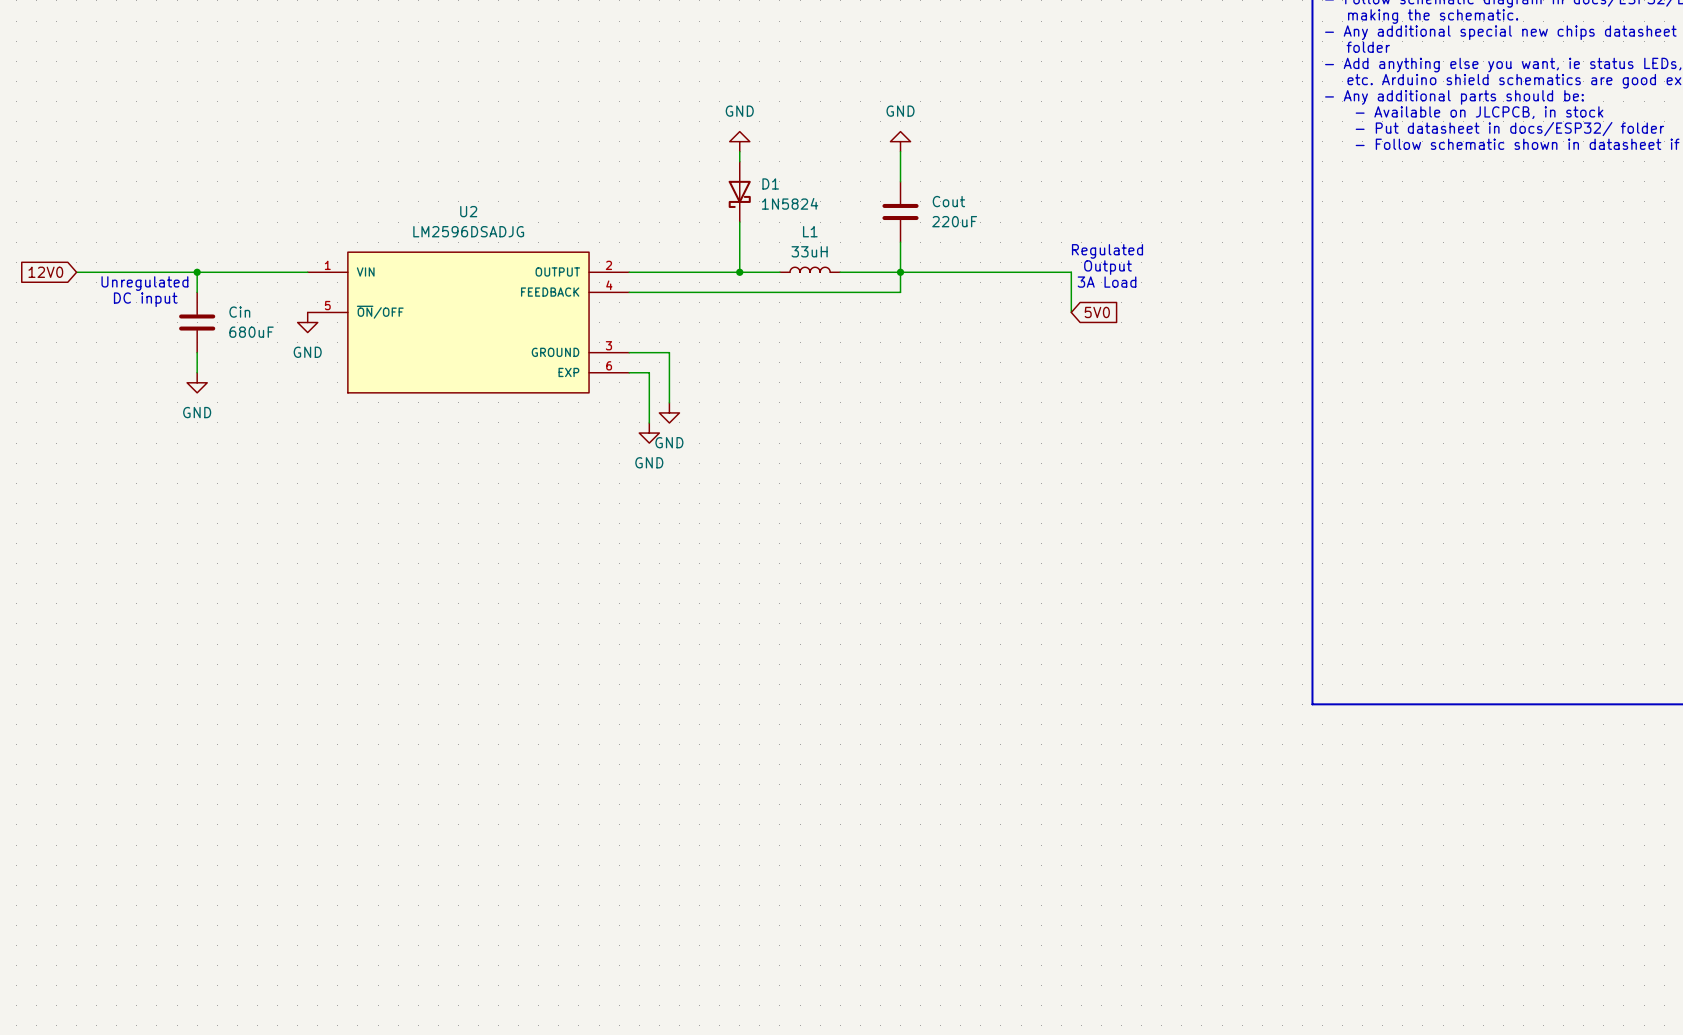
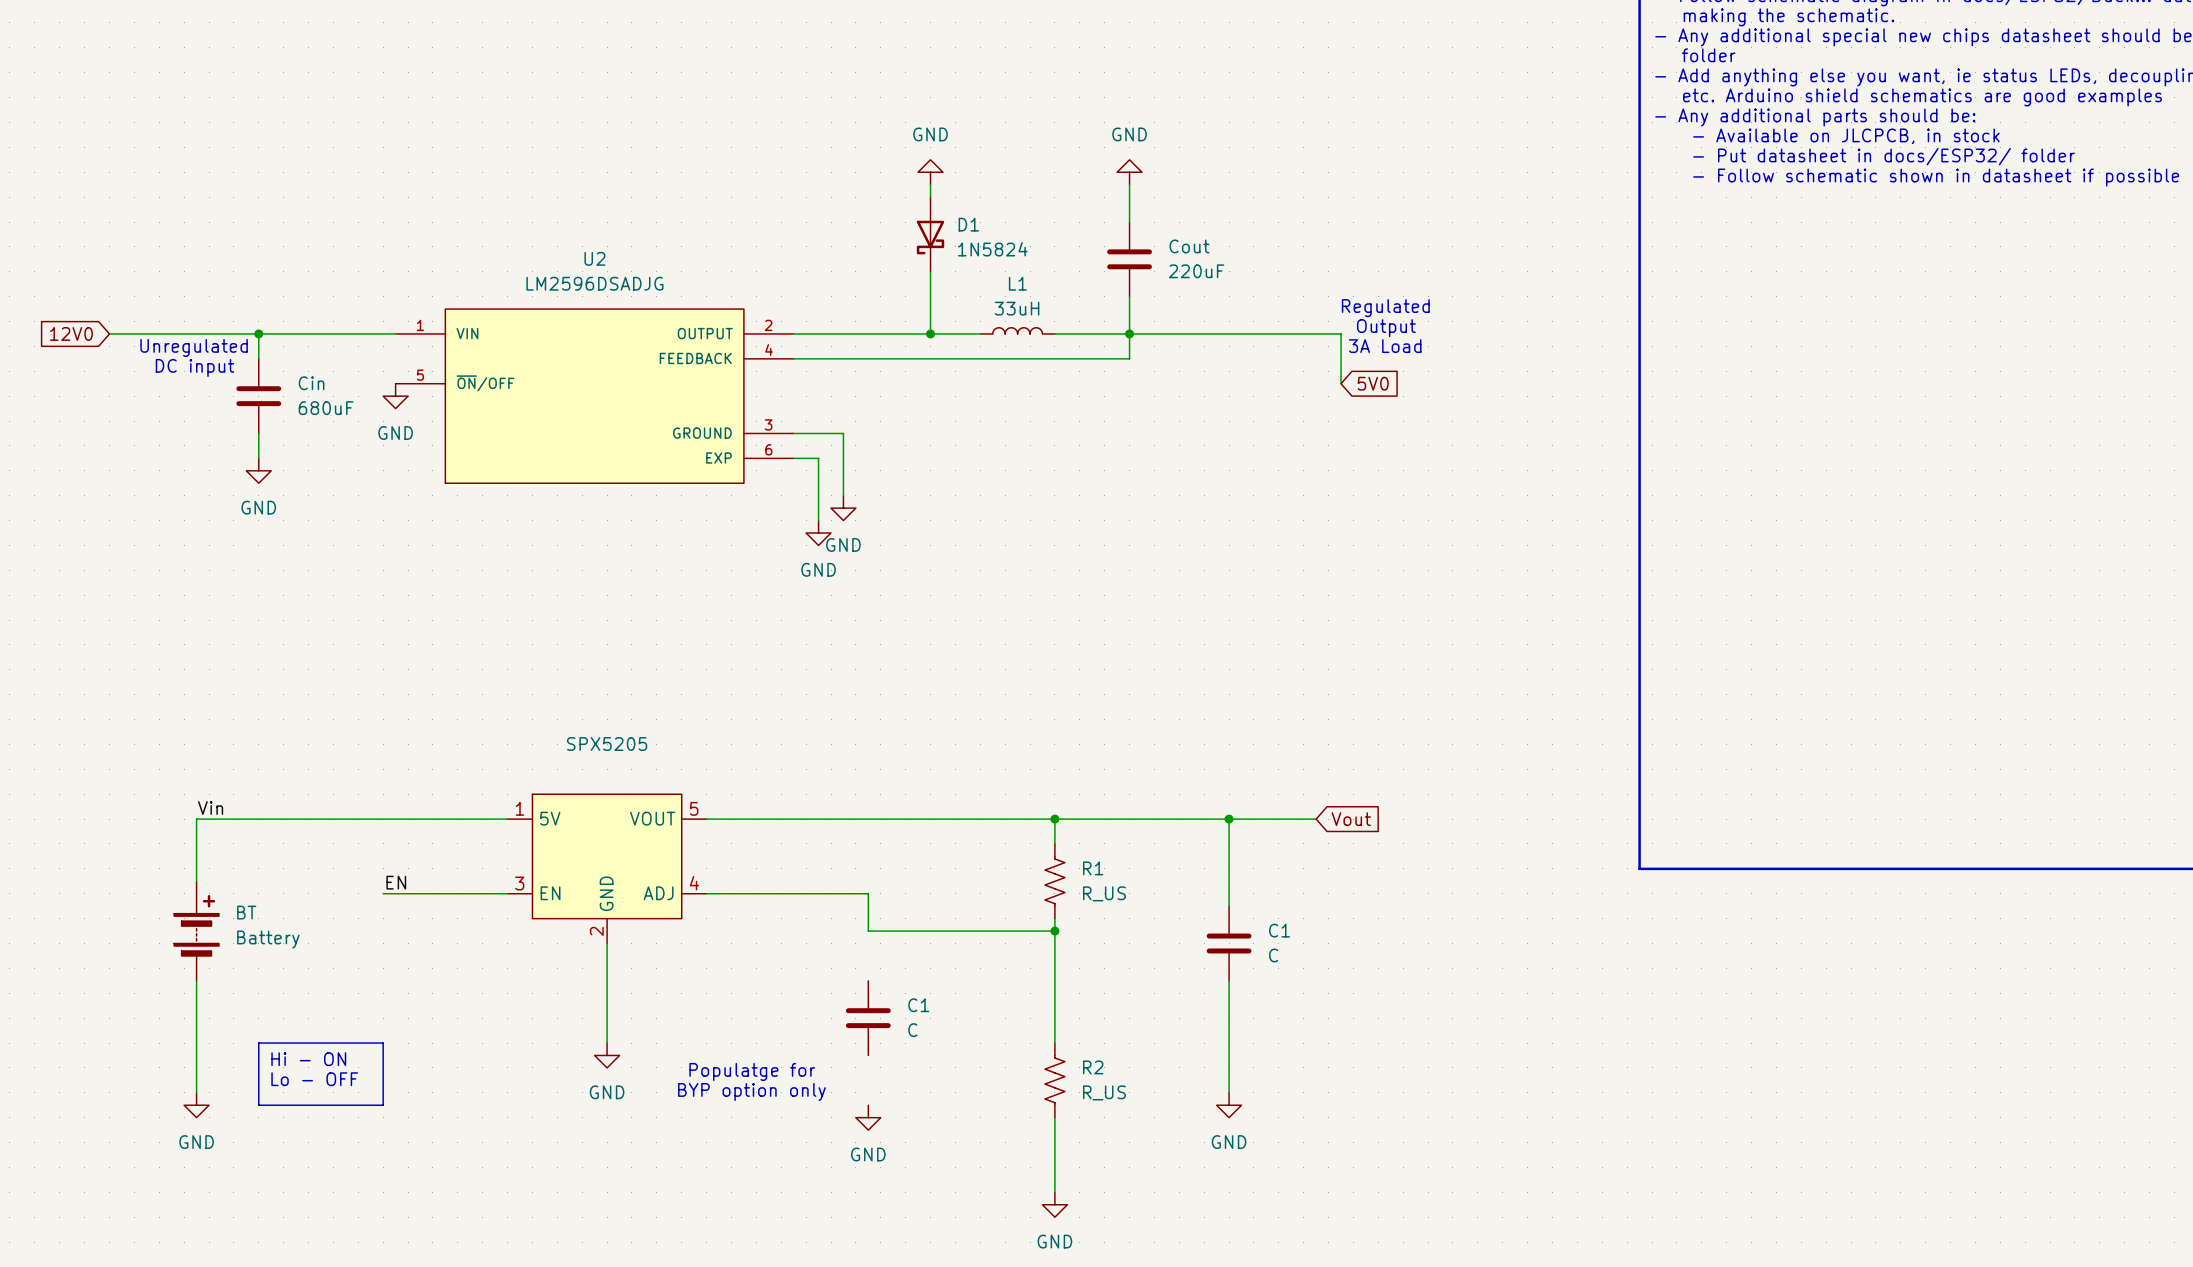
label: none -> Vin (210, 808)
wire: none -> (507, 819) (196, 819) (196, 881)
wire: none -> (706, 819) (1316, 819)
wire: none -> (1054, 819) (1054, 843)
junction: none -> (1054, 819)
wire: none -> (1229, 819) (1229, 906)
junction: none -> (1229, 819)
global label: none -> Vout (1351, 819)
SPX5205: none -> (607, 868)
R1: none -> R_US (1054, 881)
label: none -> EN (396, 882)
wire: none -> (383, 893) (507, 893)
wire: none -> (706, 893) (868, 893) (868, 931) (1054, 931)
wire: none -> (1054, 918) (1054, 1043)
BT: none -> Battery (196, 931)
junction: none -> (1054, 931)
wire: none -> (607, 943) (607, 1043)
C1: none -> C (1229, 943)
wire: none -> (196, 980) (196, 1092)
wire: none -> (1229, 980) (1229, 1092)
C1: none -> C (868, 1018)
line: none -> (258, 1043) (383, 1043) (383, 1105) (258, 1105) (258, 1043)
power symbol: none -> GND (607, 1055)
text: none -> Hi - ON (308, 1059)
text: none -> Populatge for (752, 1071)
text: none -> Lo - OFF (314, 1079)
R2: none -> R_US (1054, 1080)
text: none -> BYP option only (751, 1092)
power symbol: none -> GND (196, 1105)
power symbol: none -> GND (1229, 1105)
power symbol: none -> GND (868, 1117)
wire: none -> (1054, 1117) (1054, 1192)
power symbol: none -> GND (1054, 1204)

